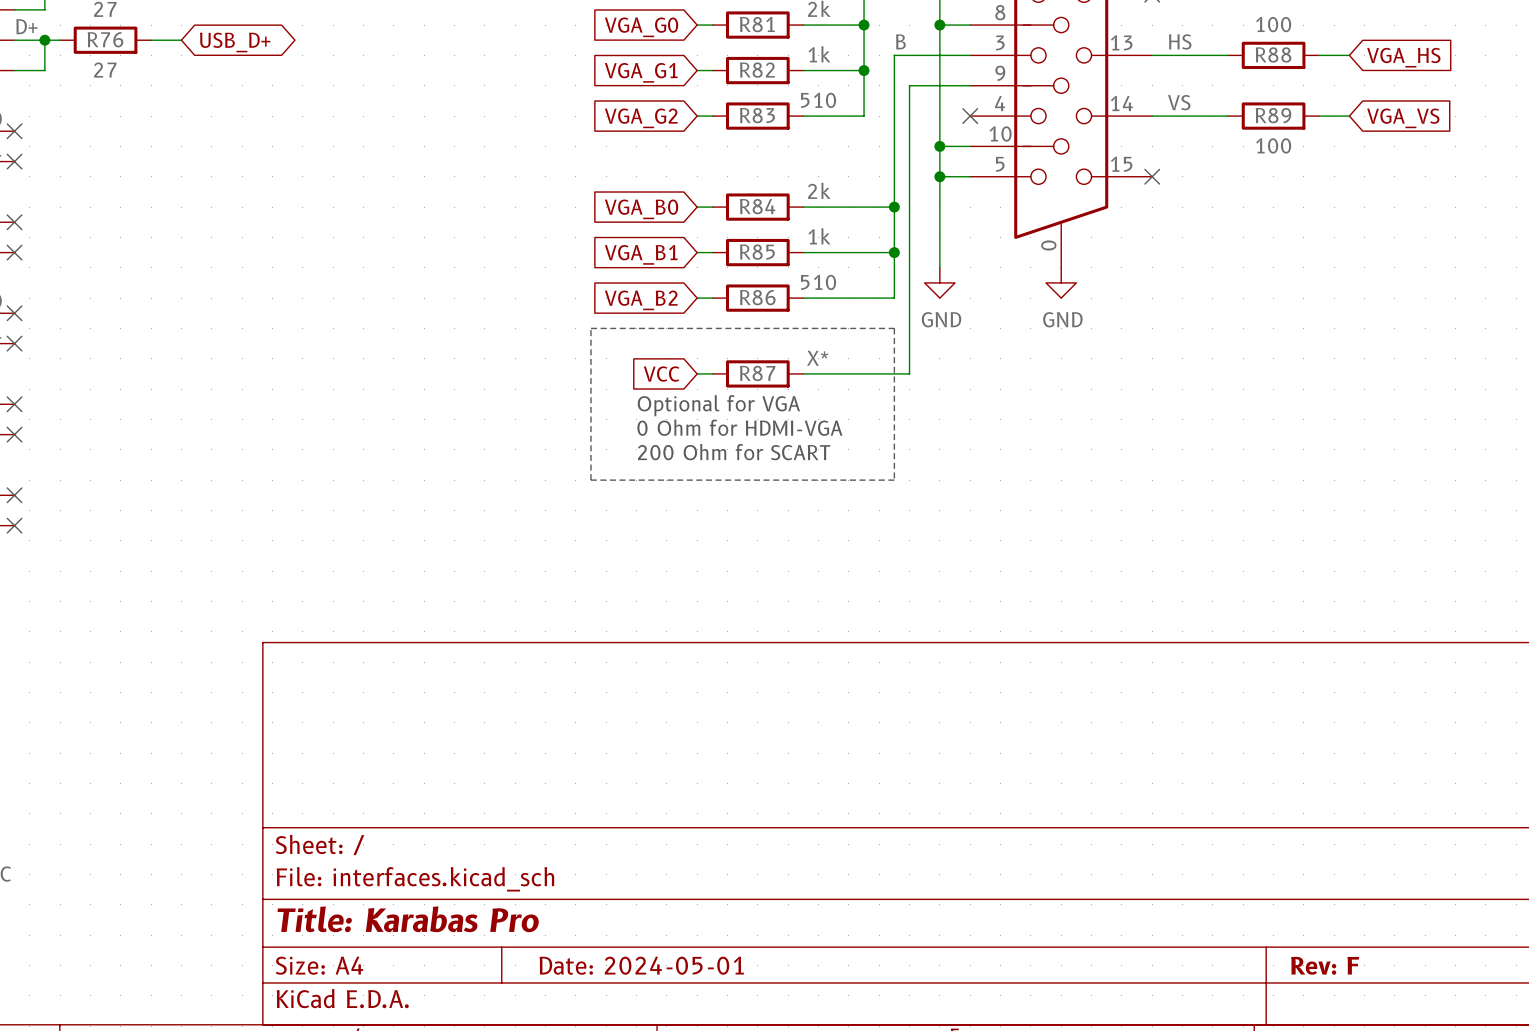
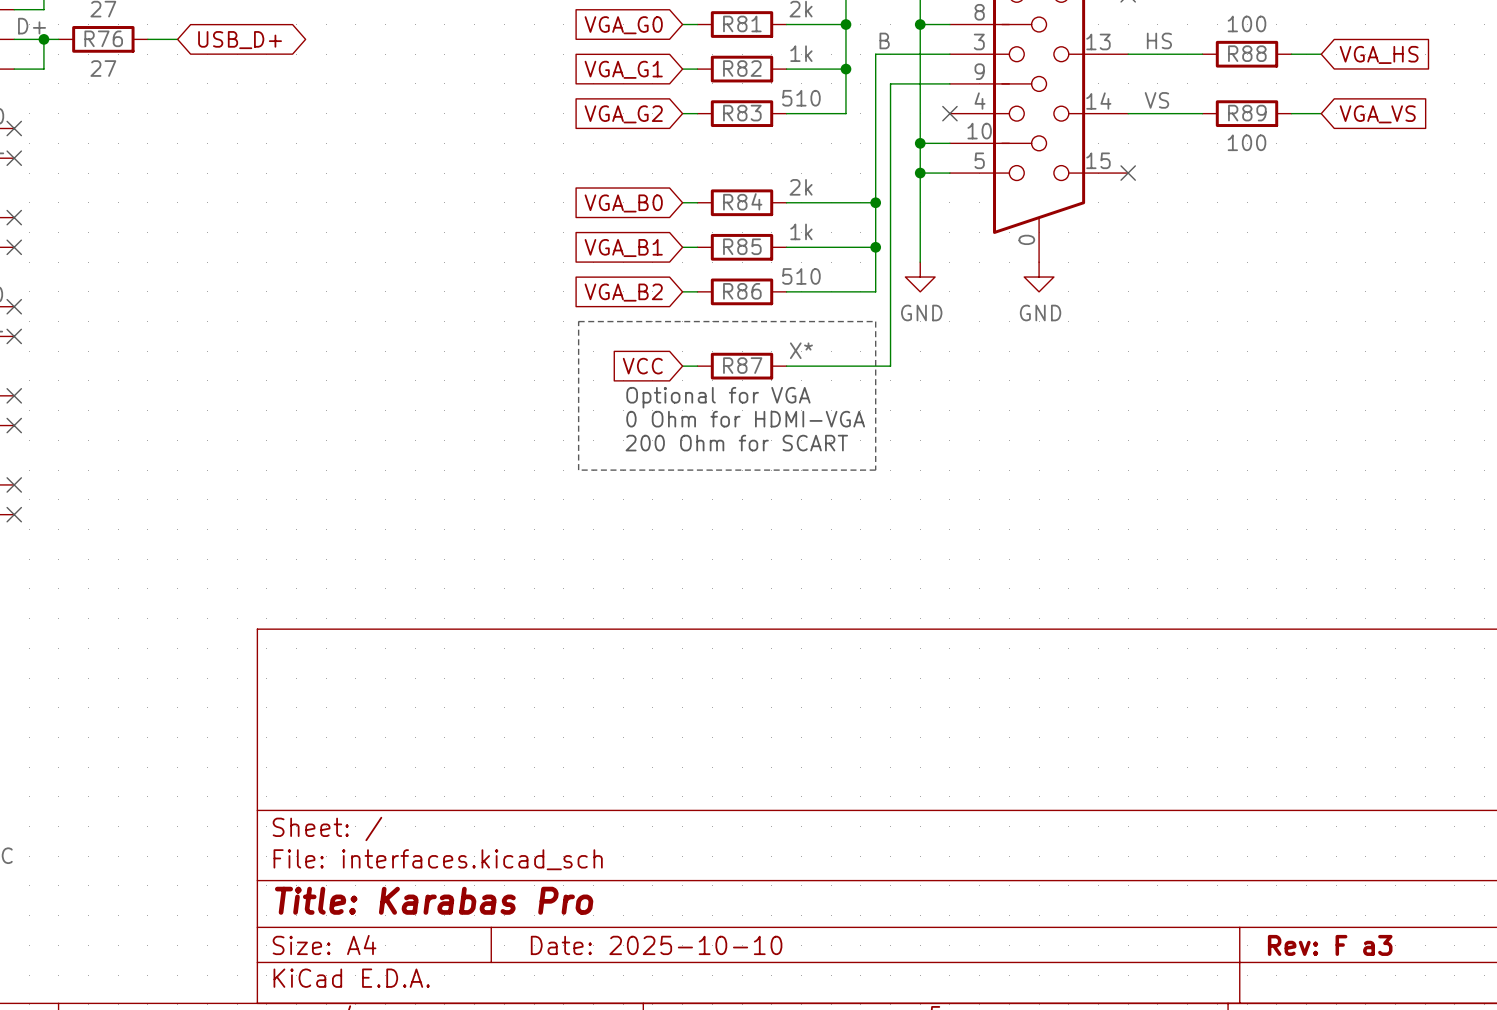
title block: Date: 2024-05-01 (641, 965) -> Date: 2025-10-10 (656, 945)
title block: Rev: F (1325, 965) -> Rev: F a3 (1330, 945)

